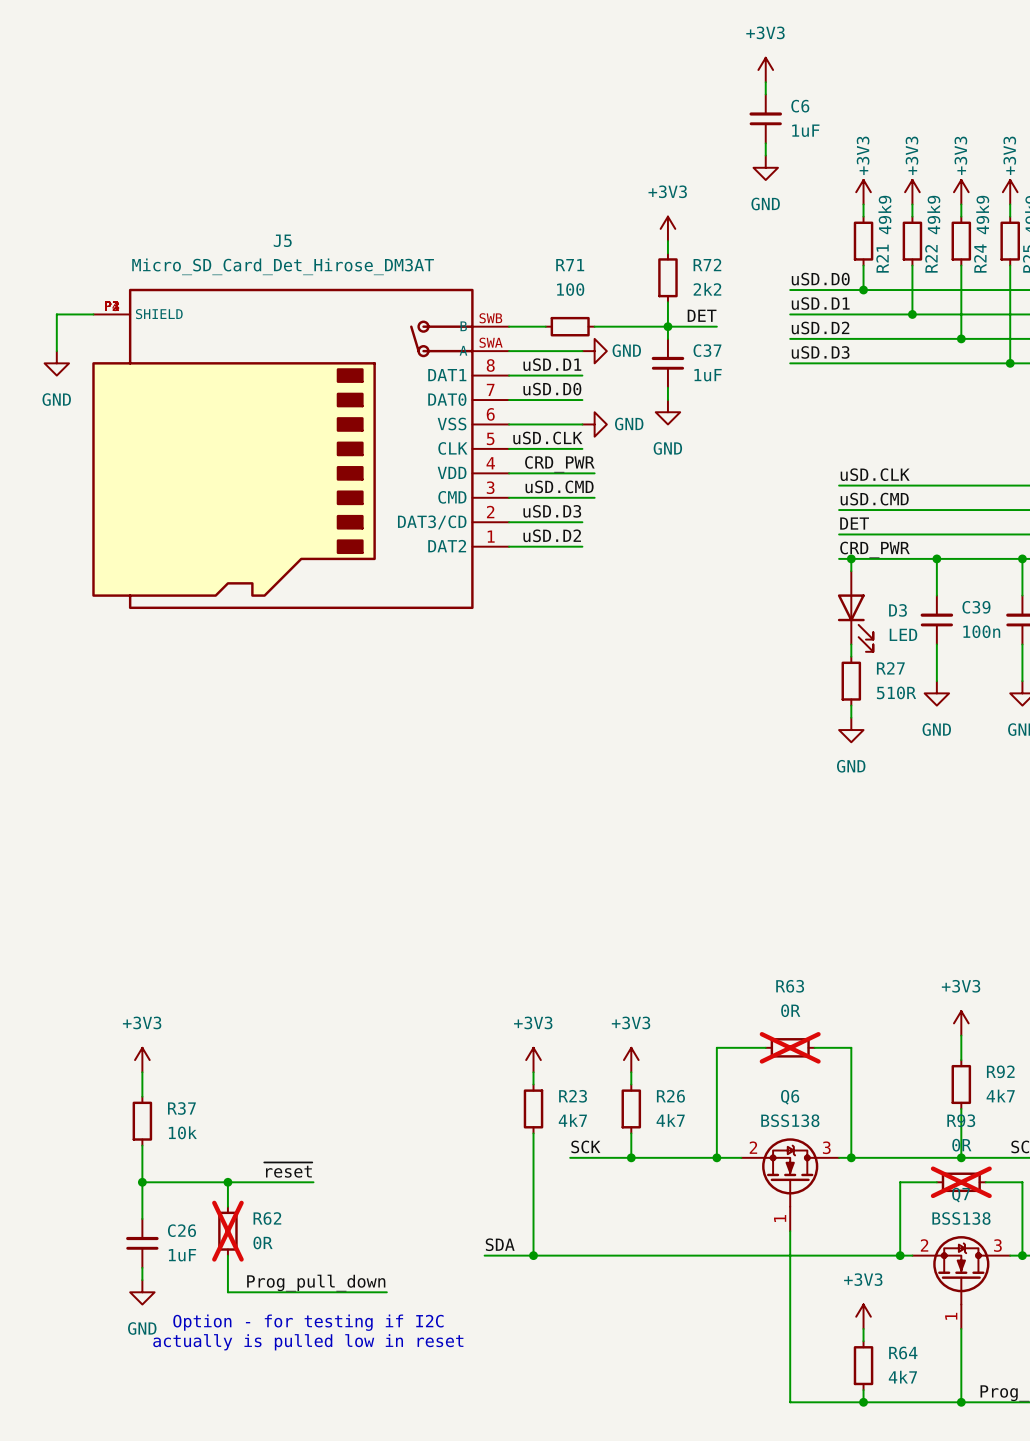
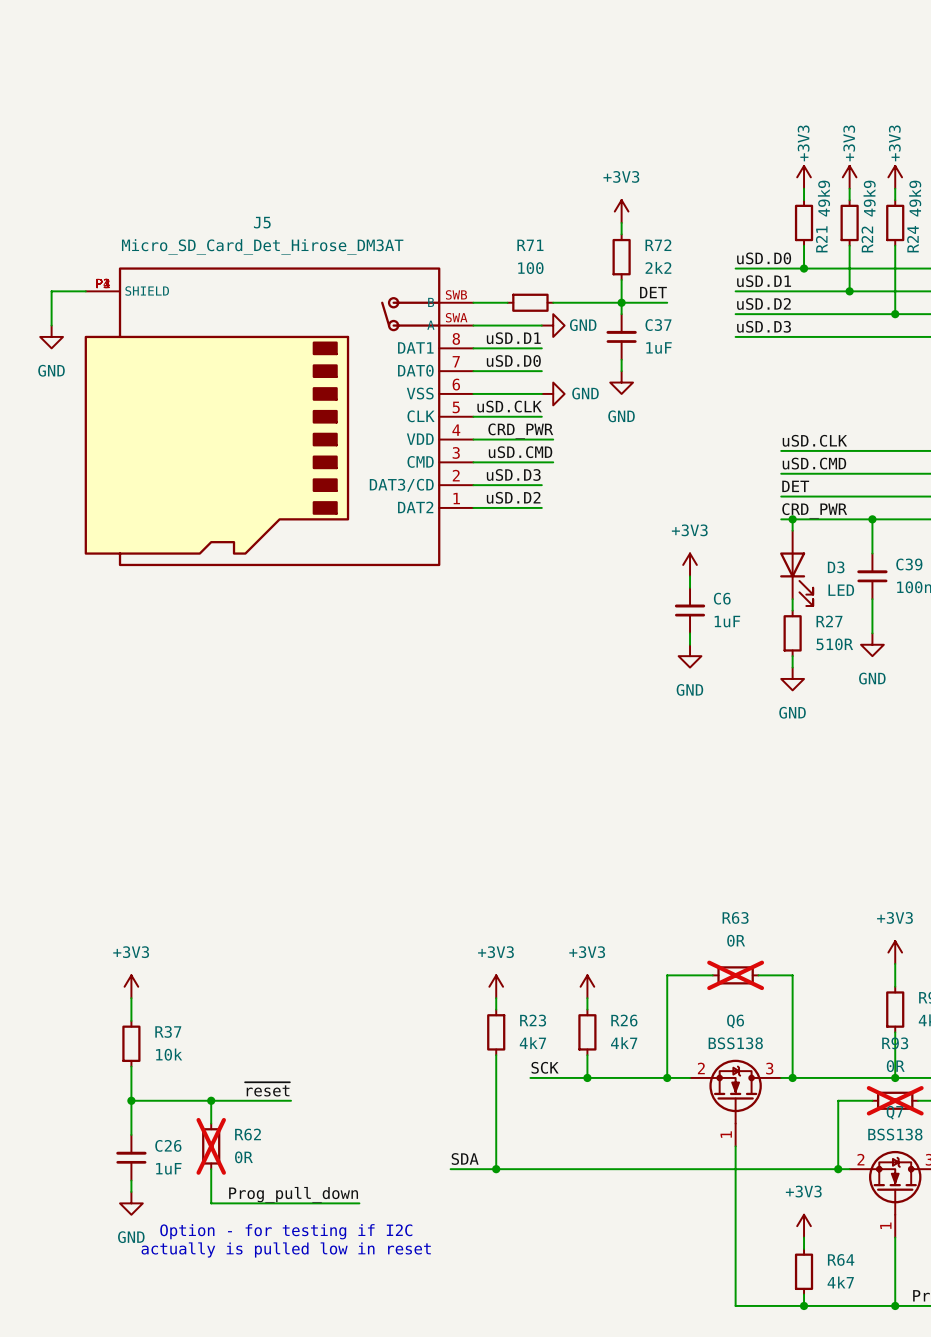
power symbol: +3V3 (765, 69) -> none
wire: (765, 82) (765, 94) -> none
C6 position: (765, 118) -> (690, 610)
wire: (765, 143) (765, 155) -> none
power symbol: GND (765, 167) -> none
power symbol: none -> +3V3 (690, 564)
wire: none -> (690, 576) (690, 587)
wire: none -> (690, 633) (690, 644)
power symbol: none -> GND (690, 656)

